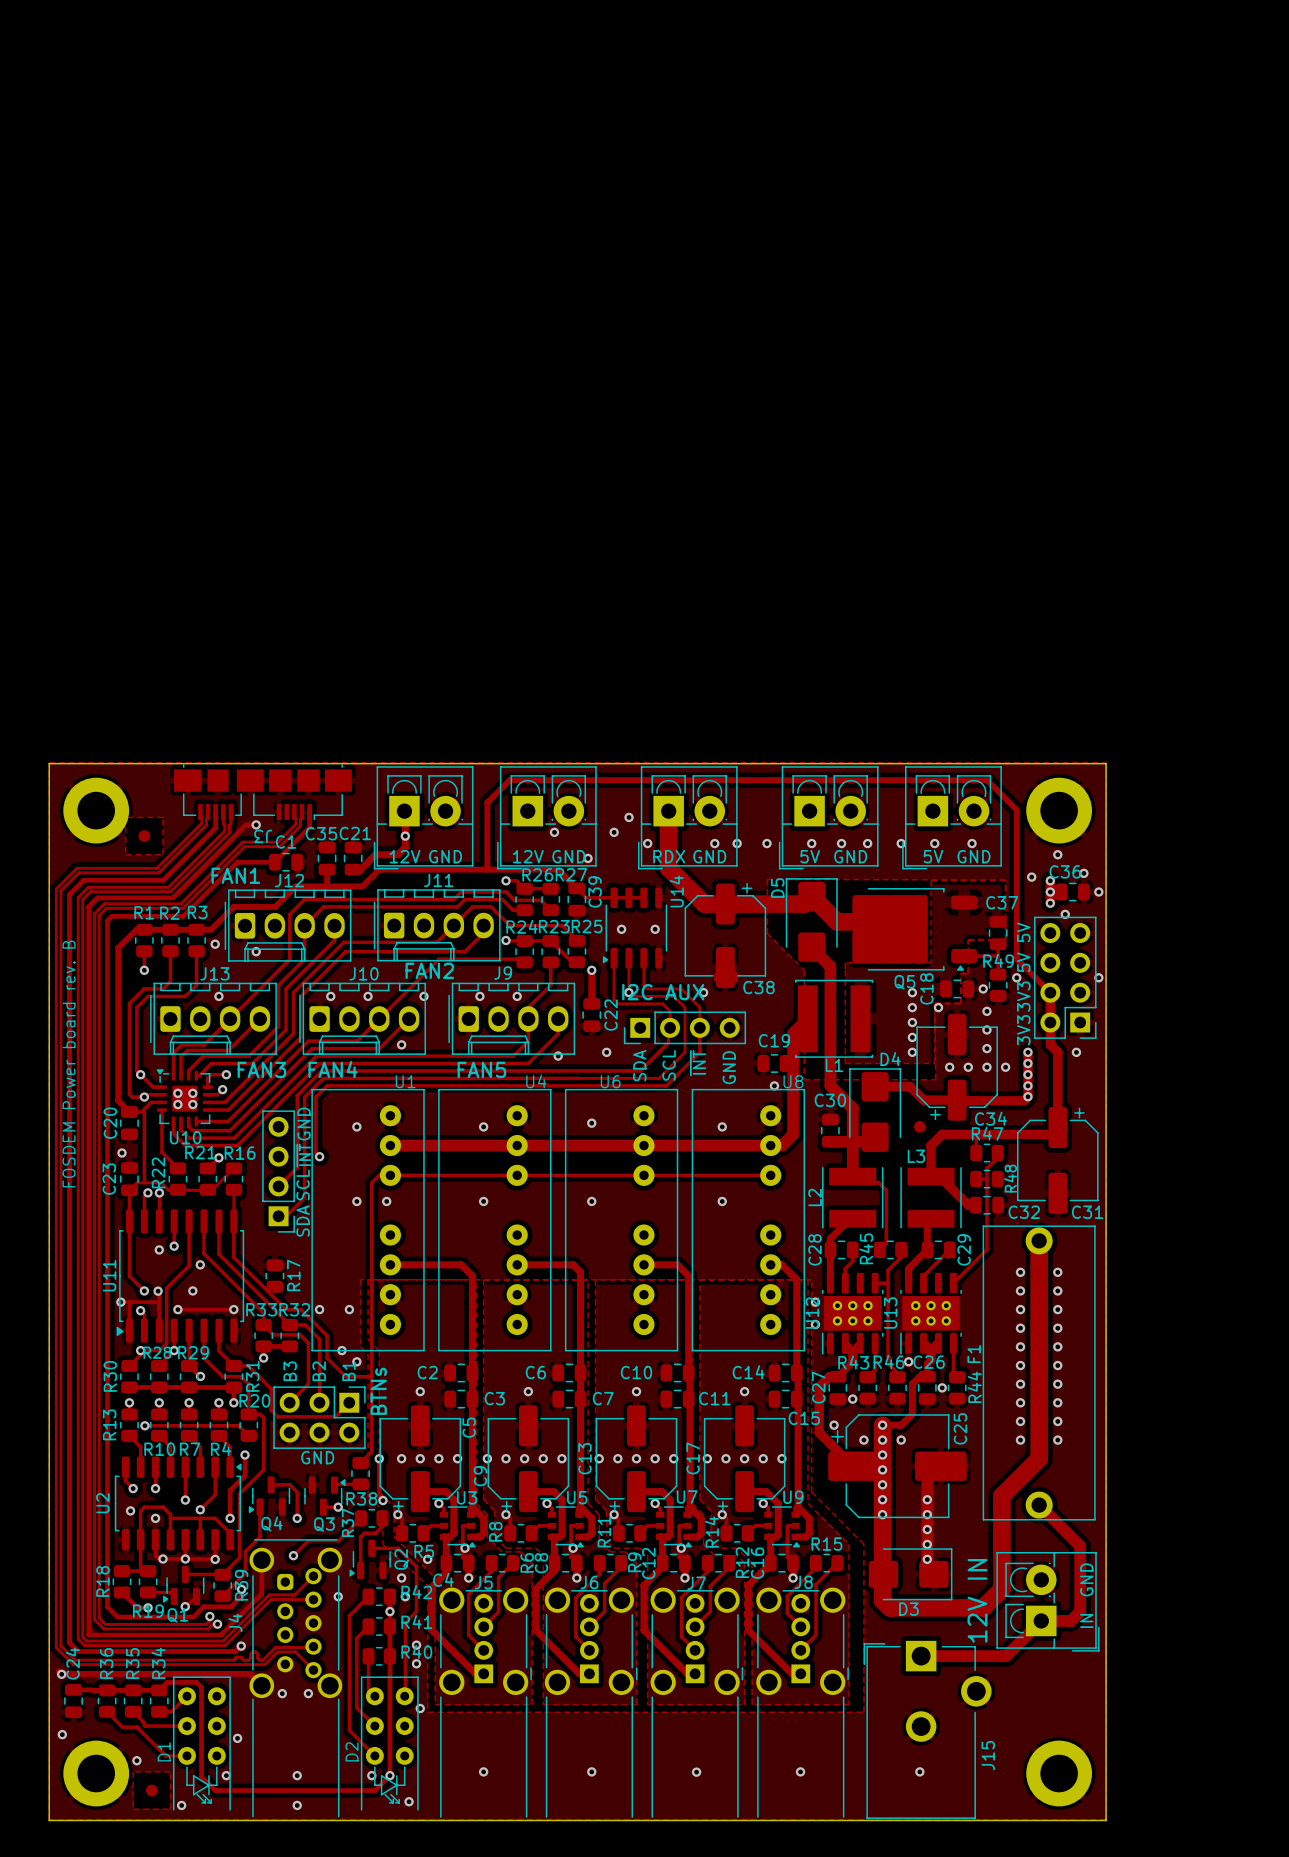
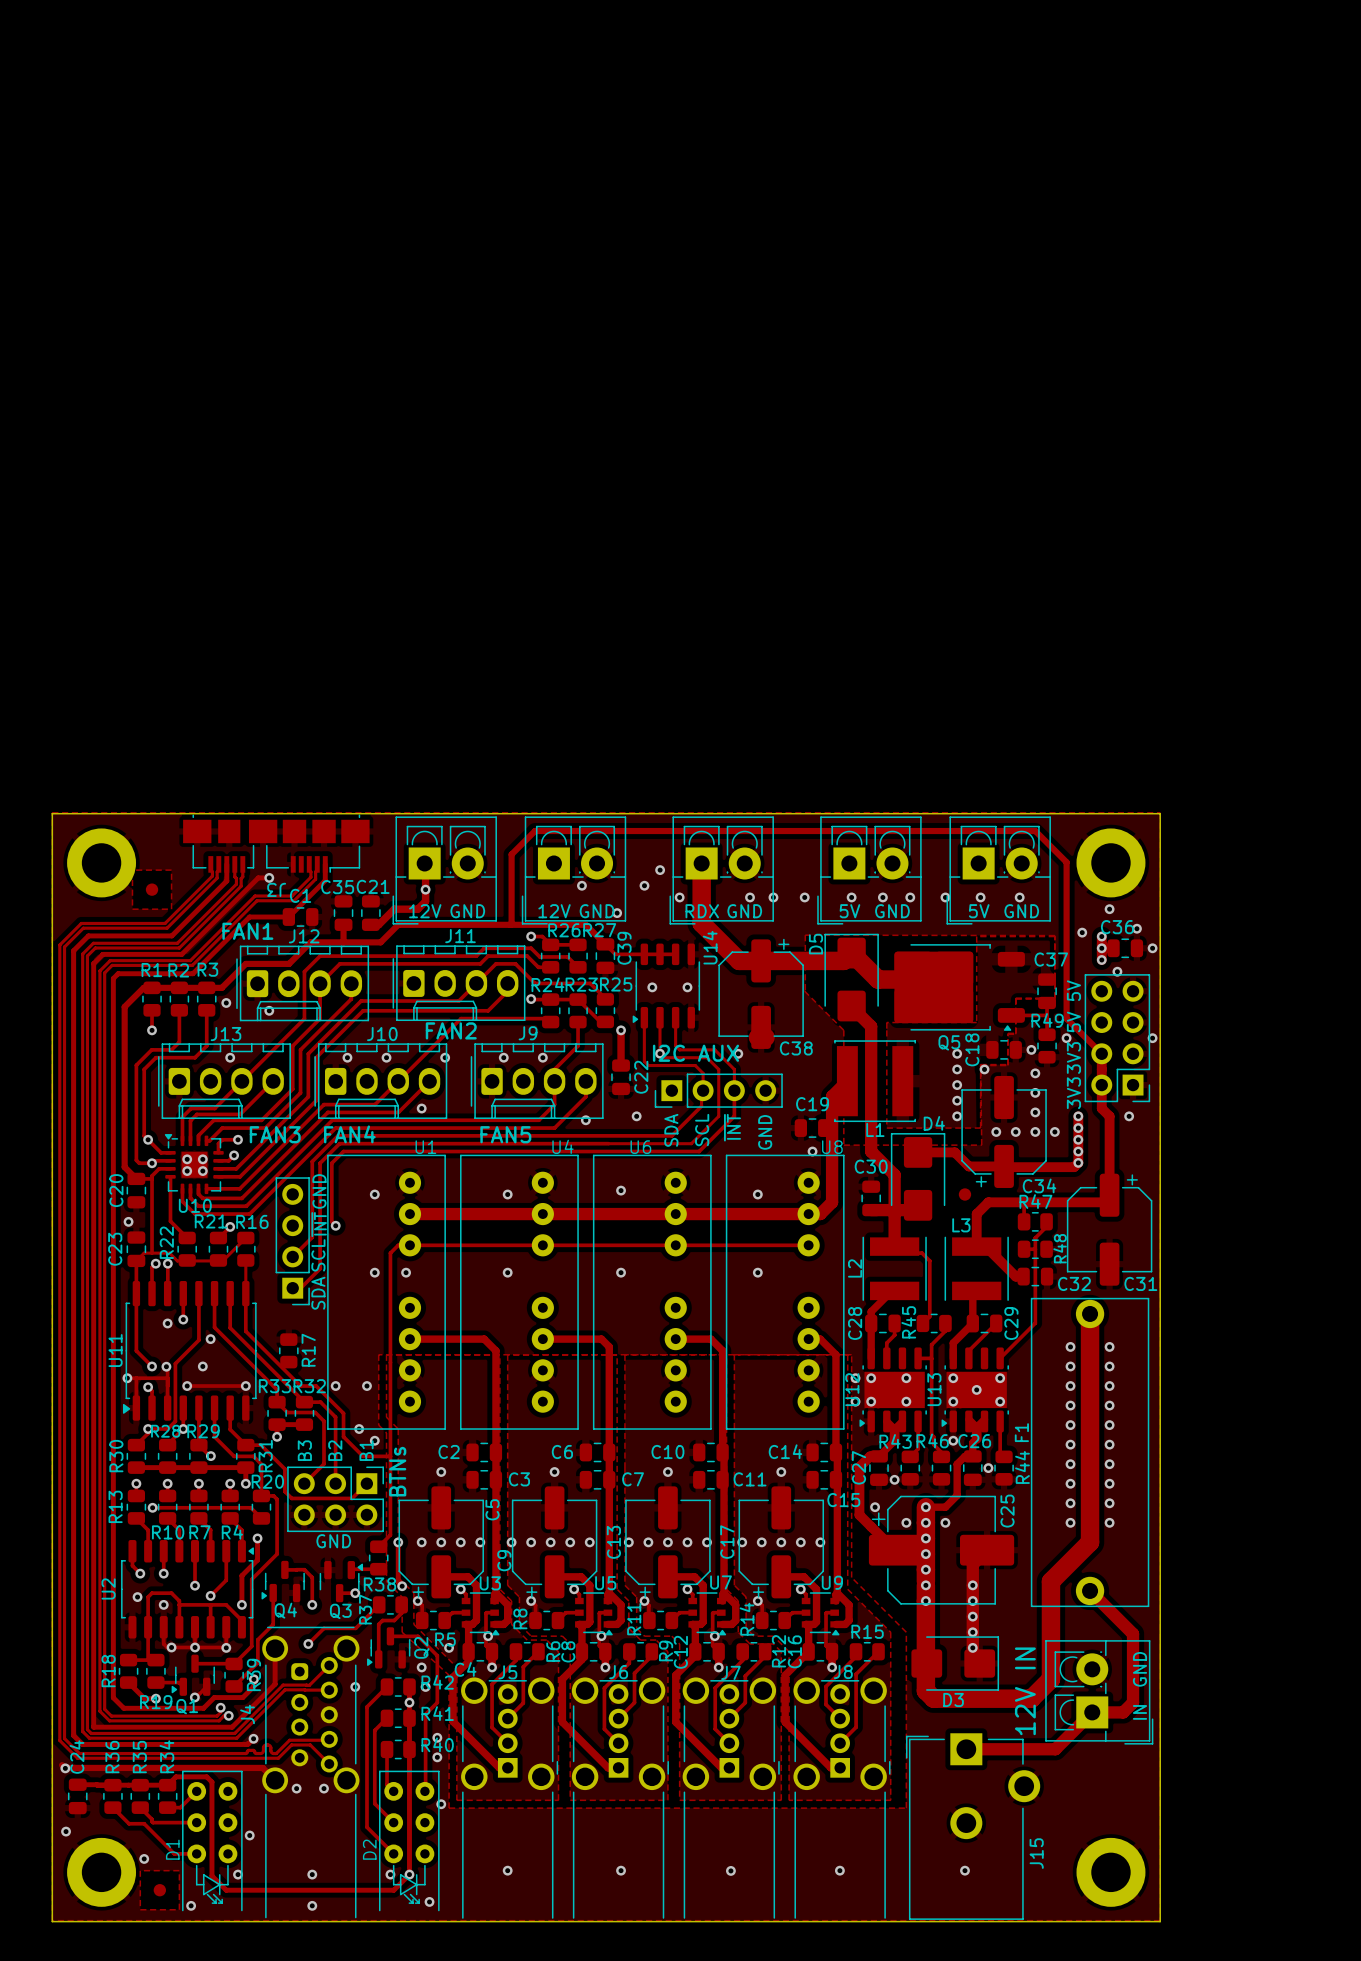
text: FOSDEM Power board rev. B (69, 1064) -> none
U12 footprint: [821, 1272, 884, 1355] -> [859, 1347, 927, 1433]
U13 footprint: [900, 1272, 962, 1355] -> [941, 1347, 1009, 1433]
via: none -> (871, 1378)
via: none -> (906, 1378)
via: none -> (953, 1378)
via: none -> (1000, 1378)
via: none -> (976, 1389)
via: none -> (871, 1401)
via: none -> (906, 1401)
via: none -> (953, 1401)
via: none -> (1000, 1401)

